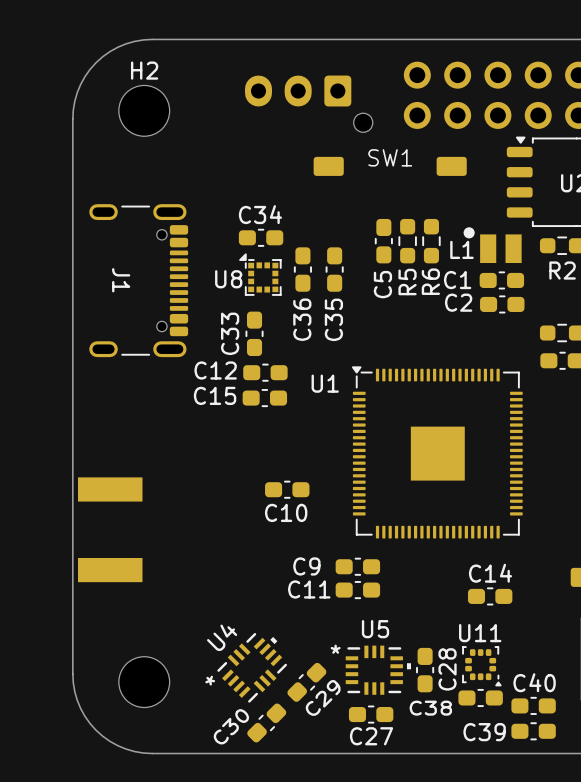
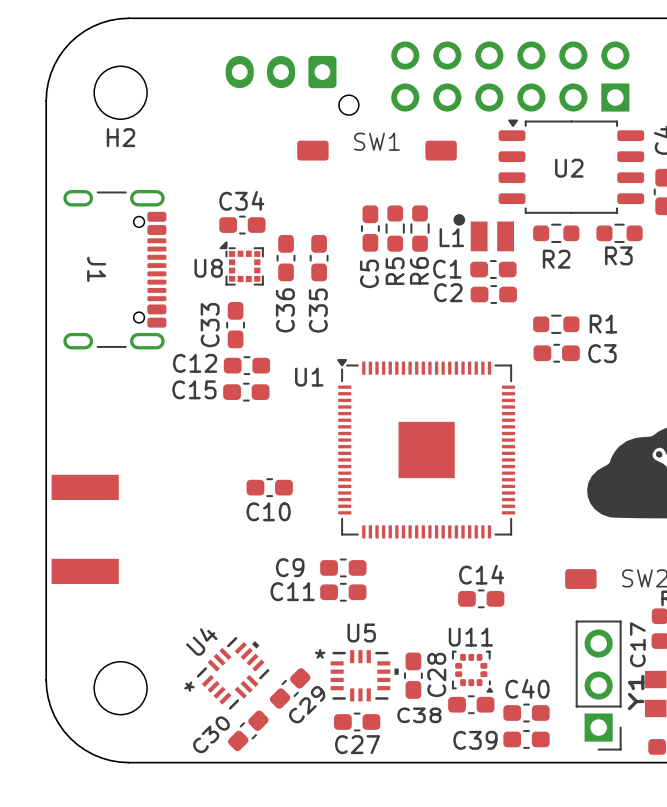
H2 name position: H2 (144, 70) -> H2 (121, 137)

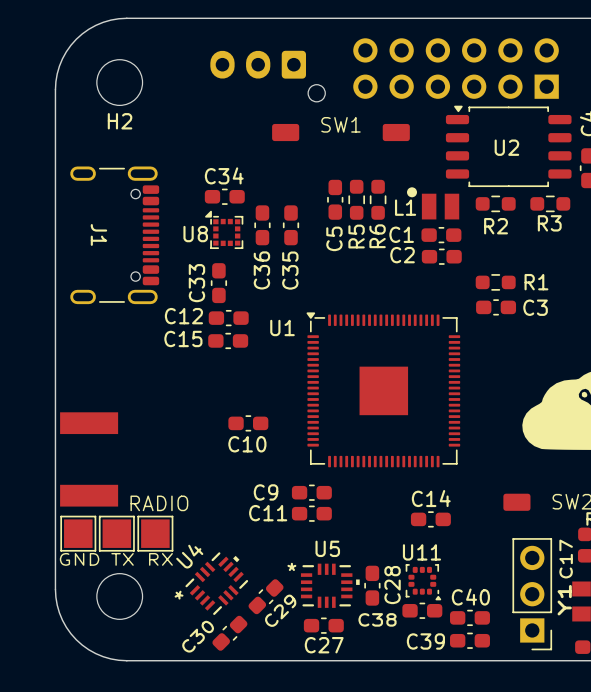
text: none -> RADIO (159, 503)
part: none -> (78, 533)
part: none -> (116, 533)
part: none -> (155, 533)
text: none -> GND (79, 559)
text: none -> TX (122, 559)
text: none -> RX (160, 559)

